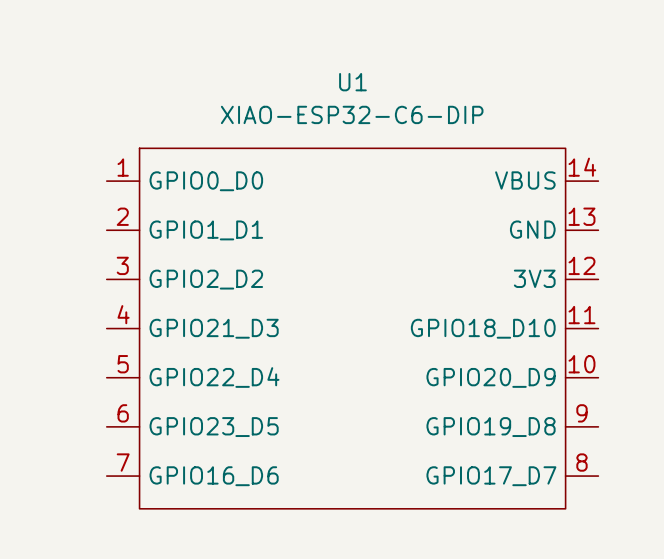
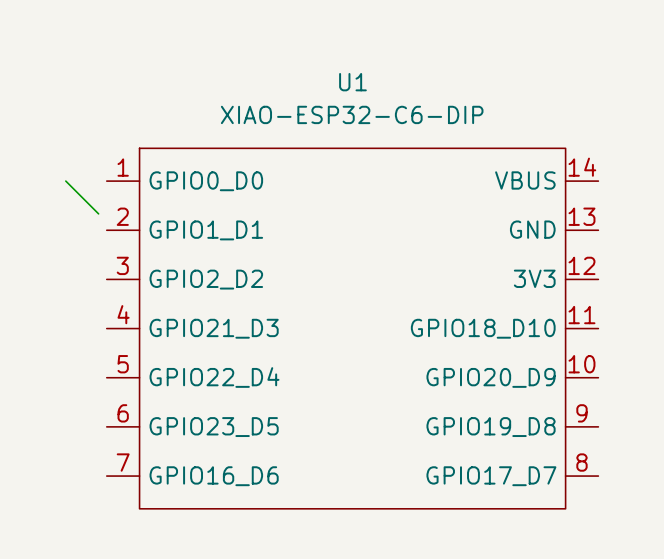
wire: none -> (65, 181) (98, 213)

